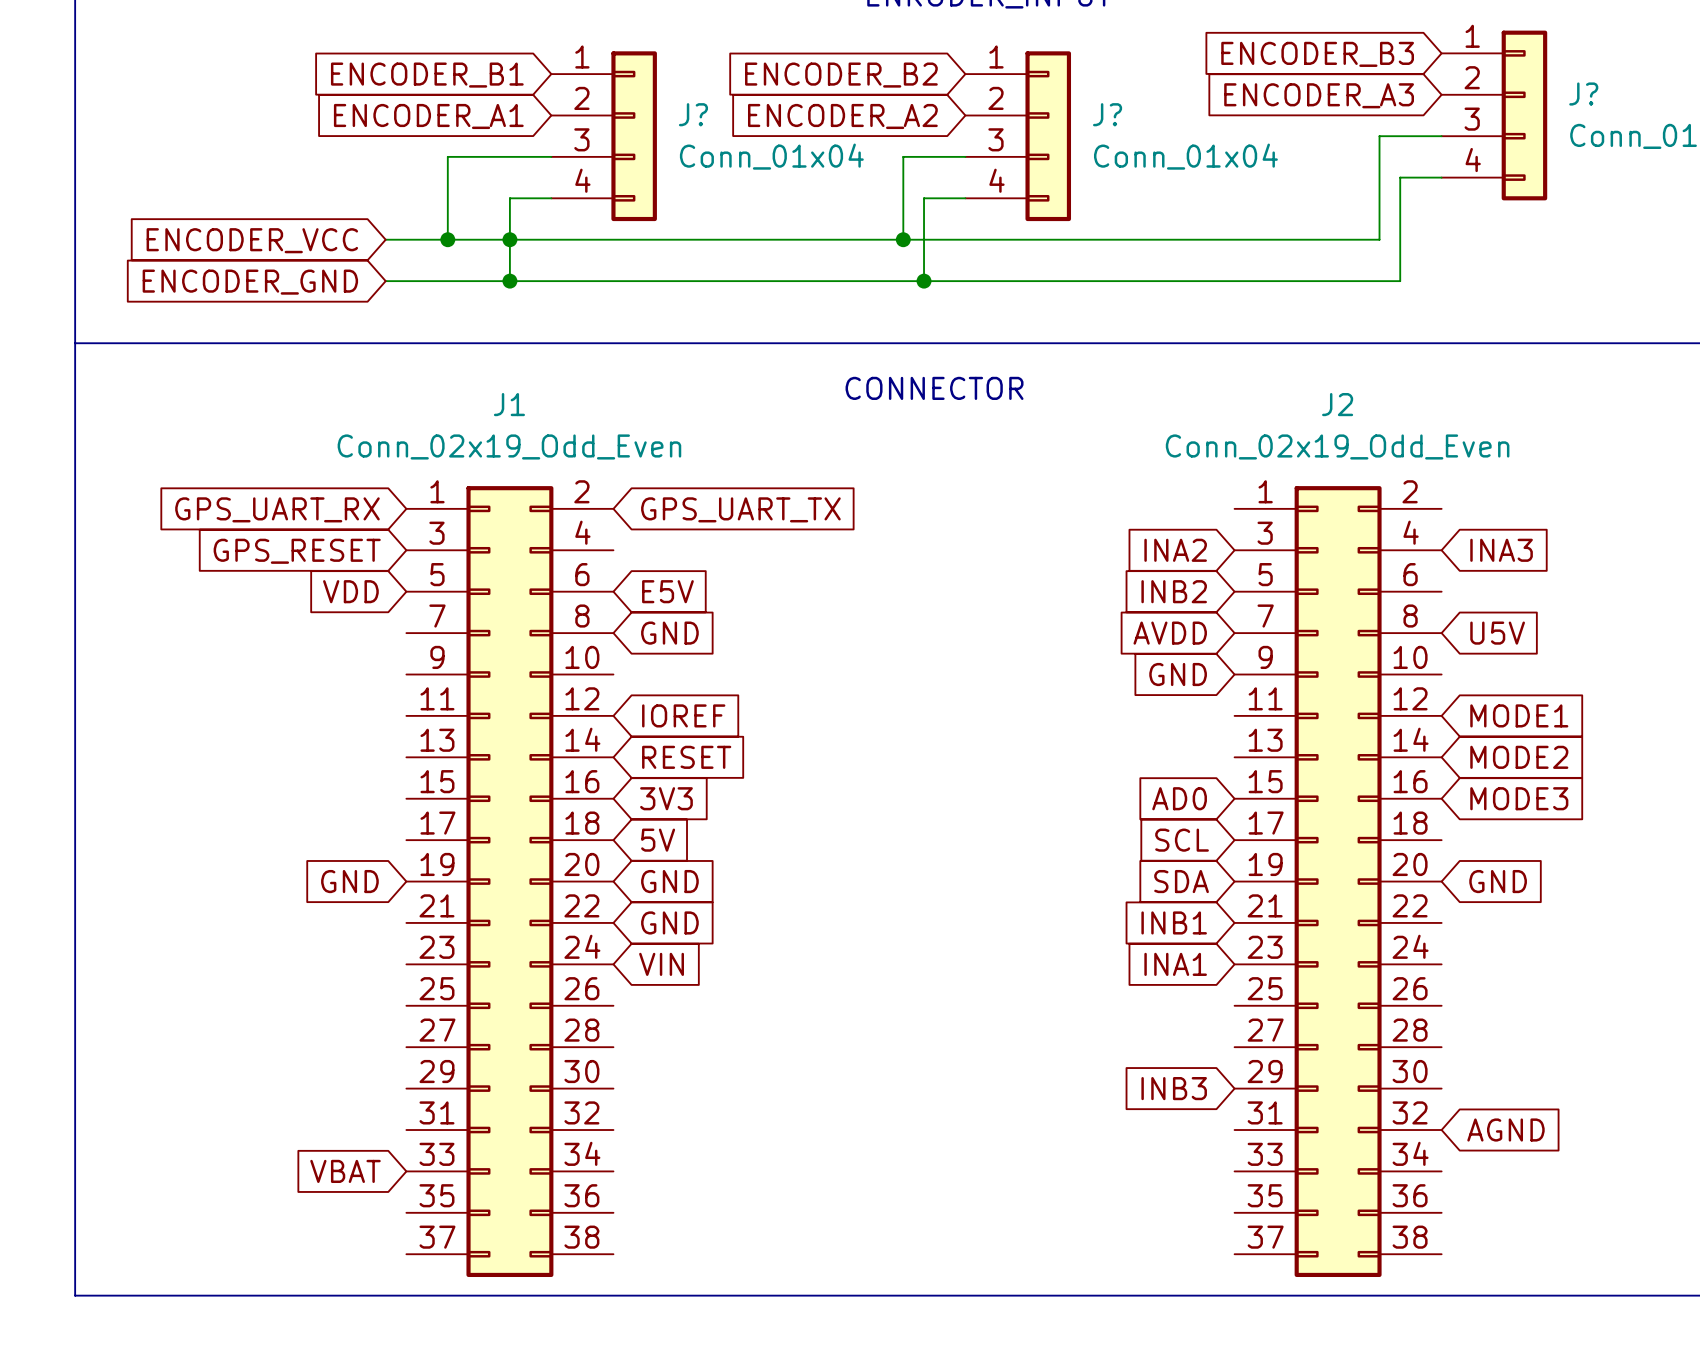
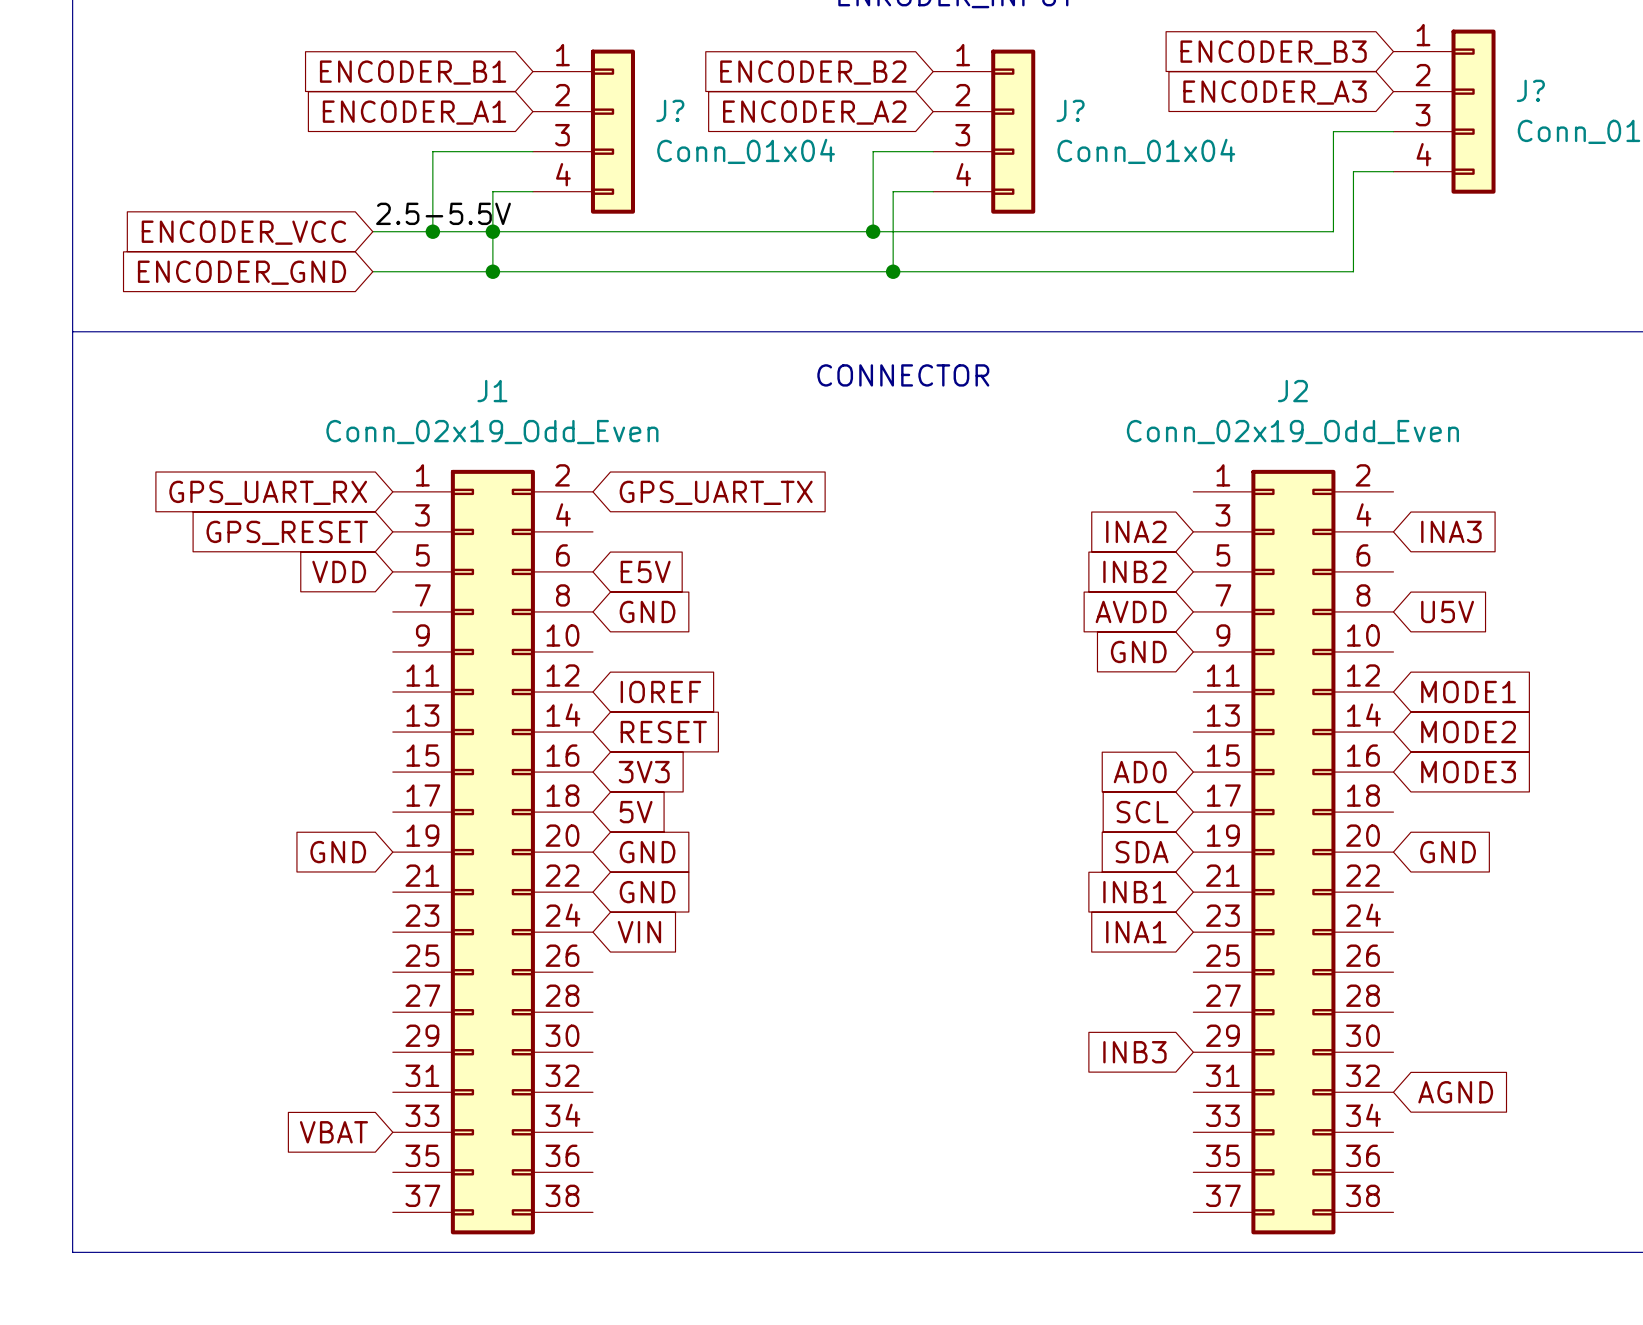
label: none -> 2.5-5.5V (443, 213)

